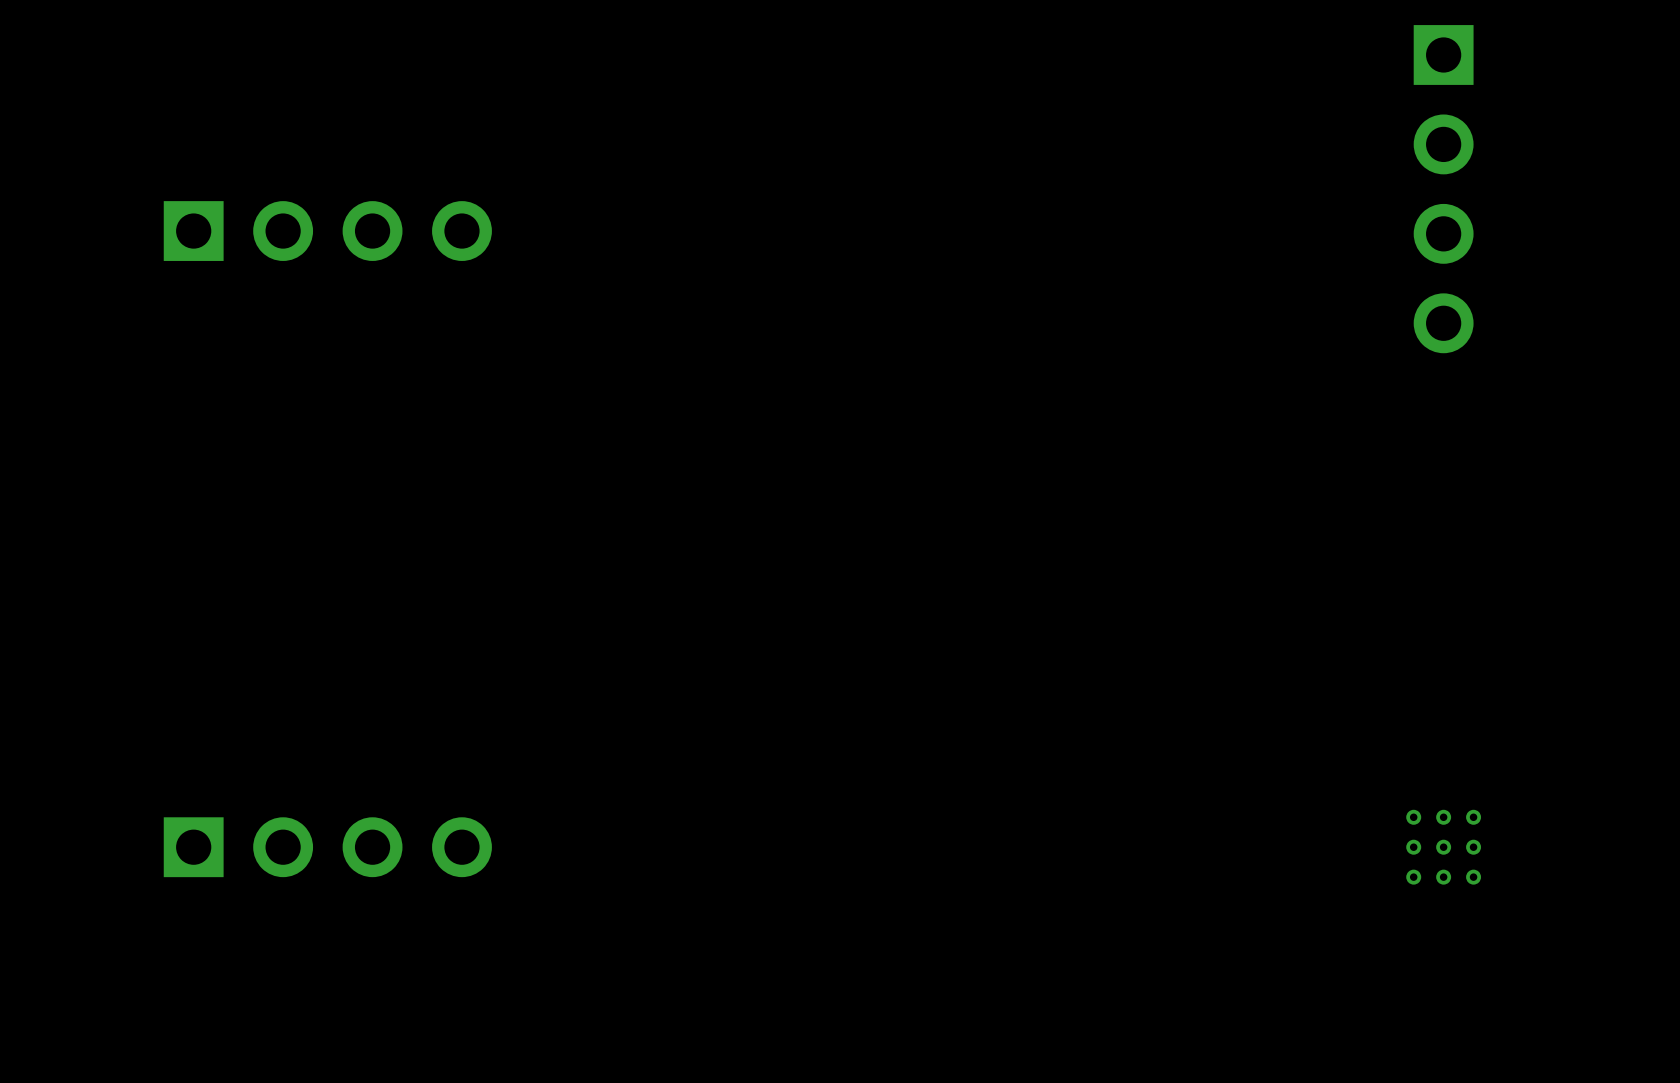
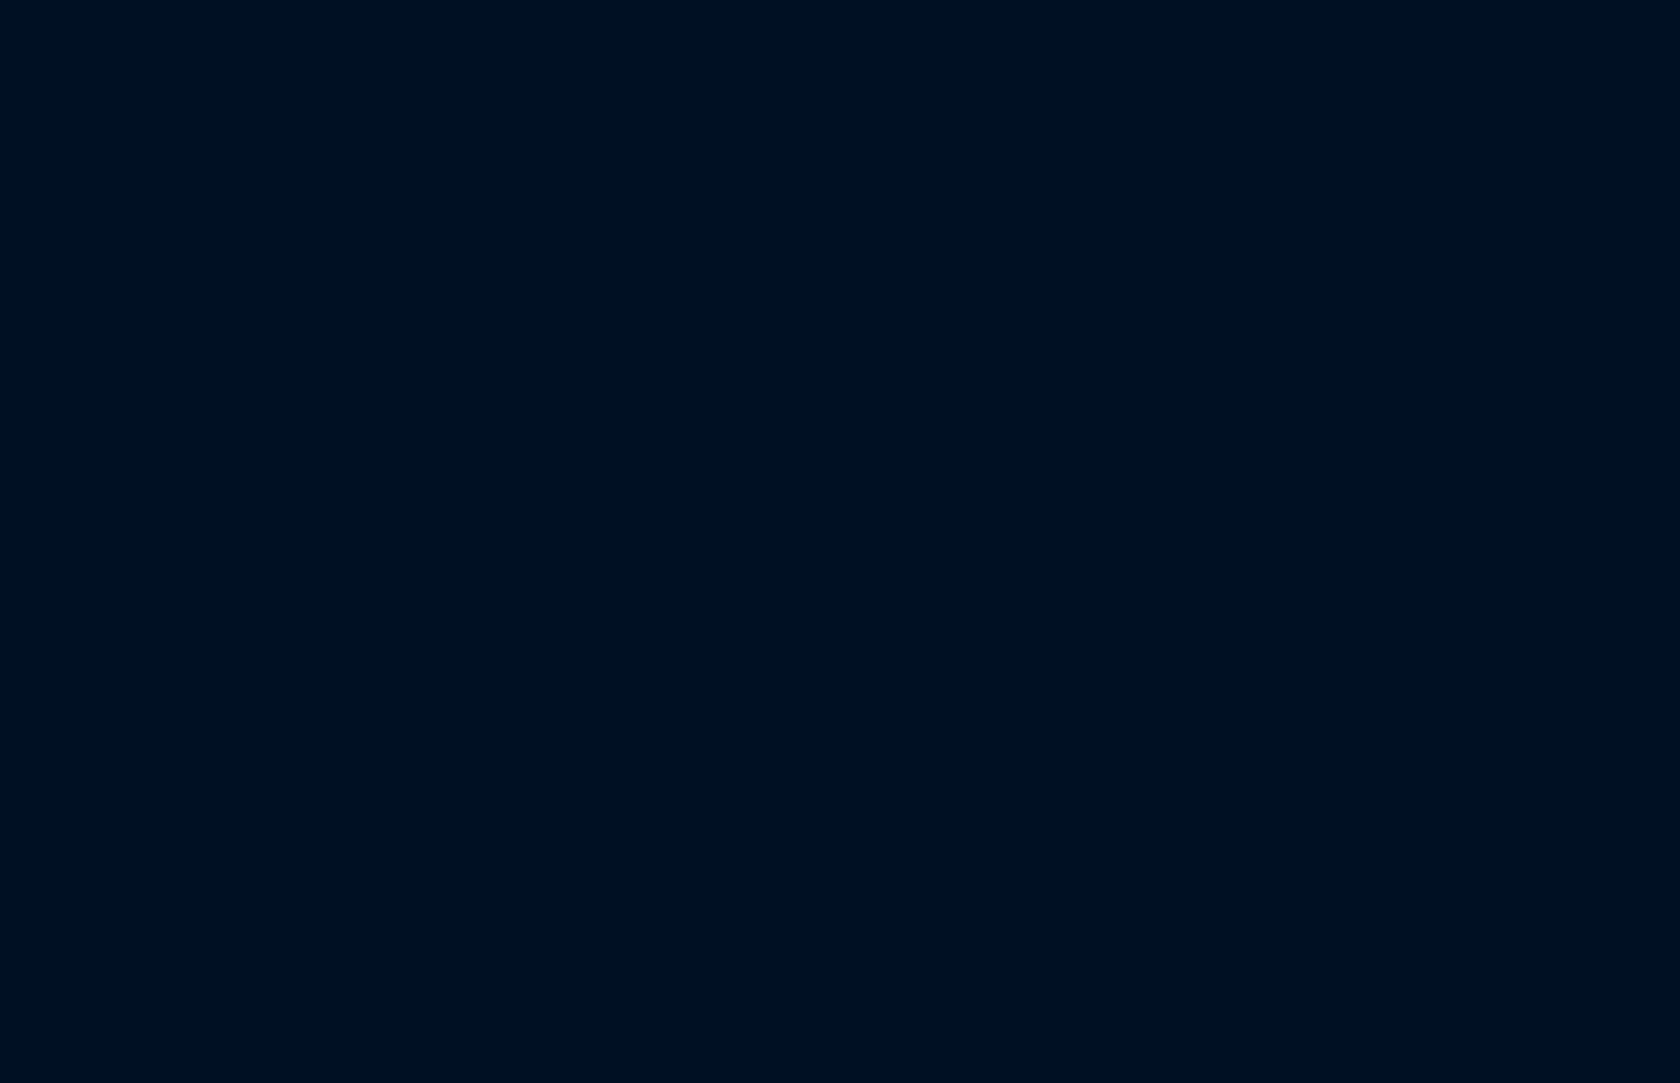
part: (1443, 189) -> none
part: (327, 231) -> none
part: (327, 847) -> none
part: (1443, 847) -> none

